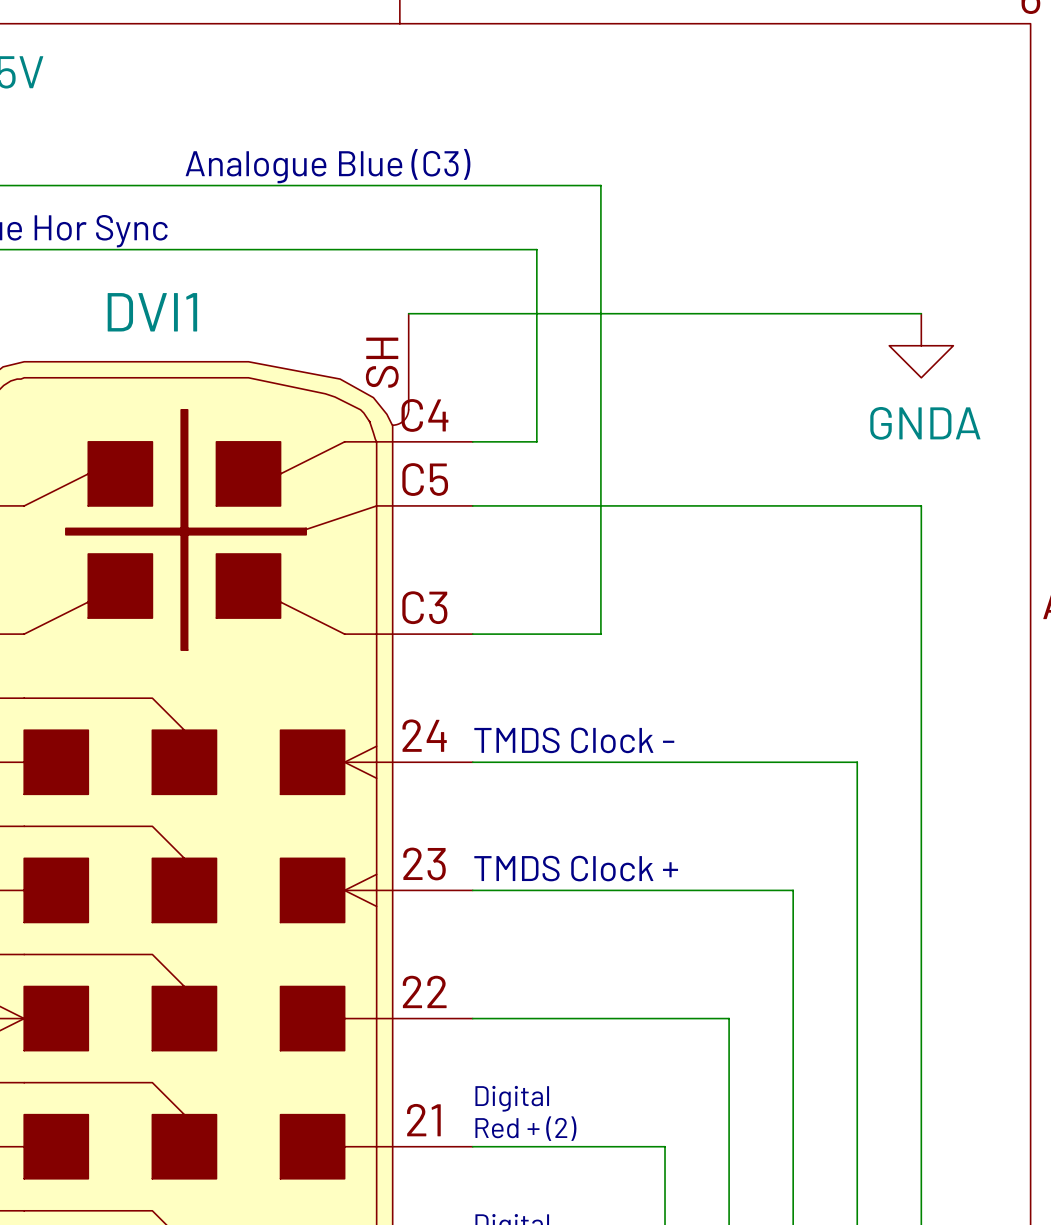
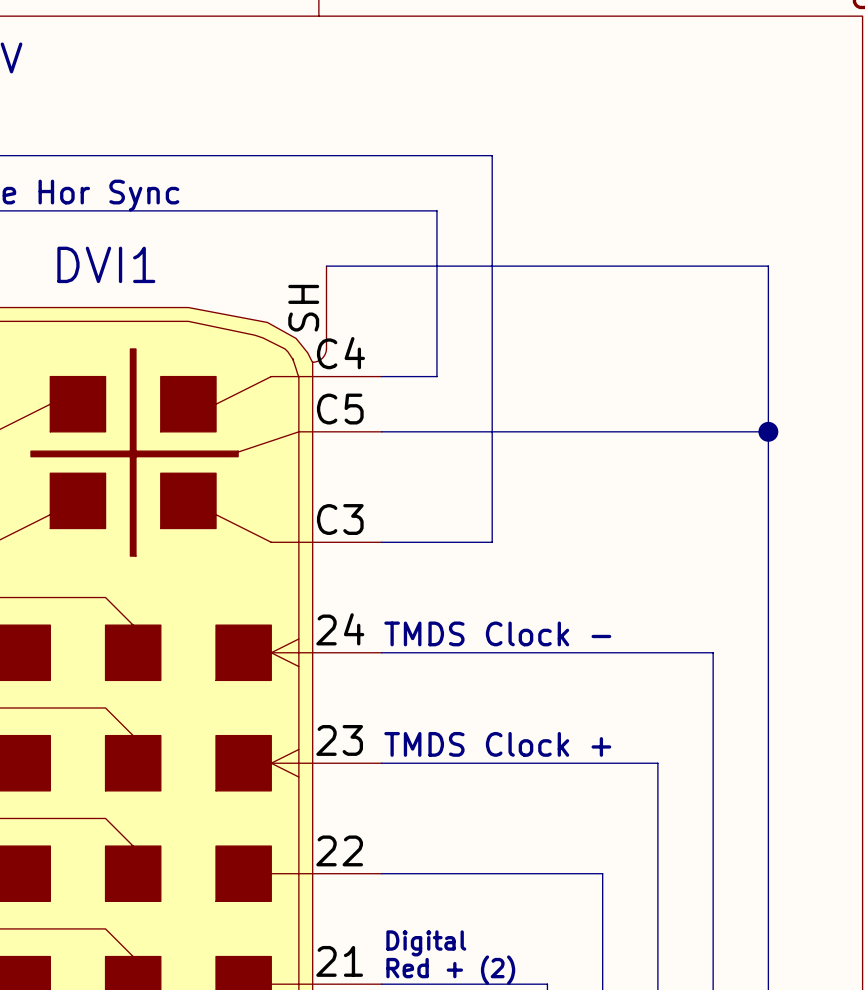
text: Analogue Blue (C3) (327, 166) -> none
wire: none -> (768, 266) (768, 431)
power symbol: GNDA (921, 345) -> none
junction: none -> (768, 431)

